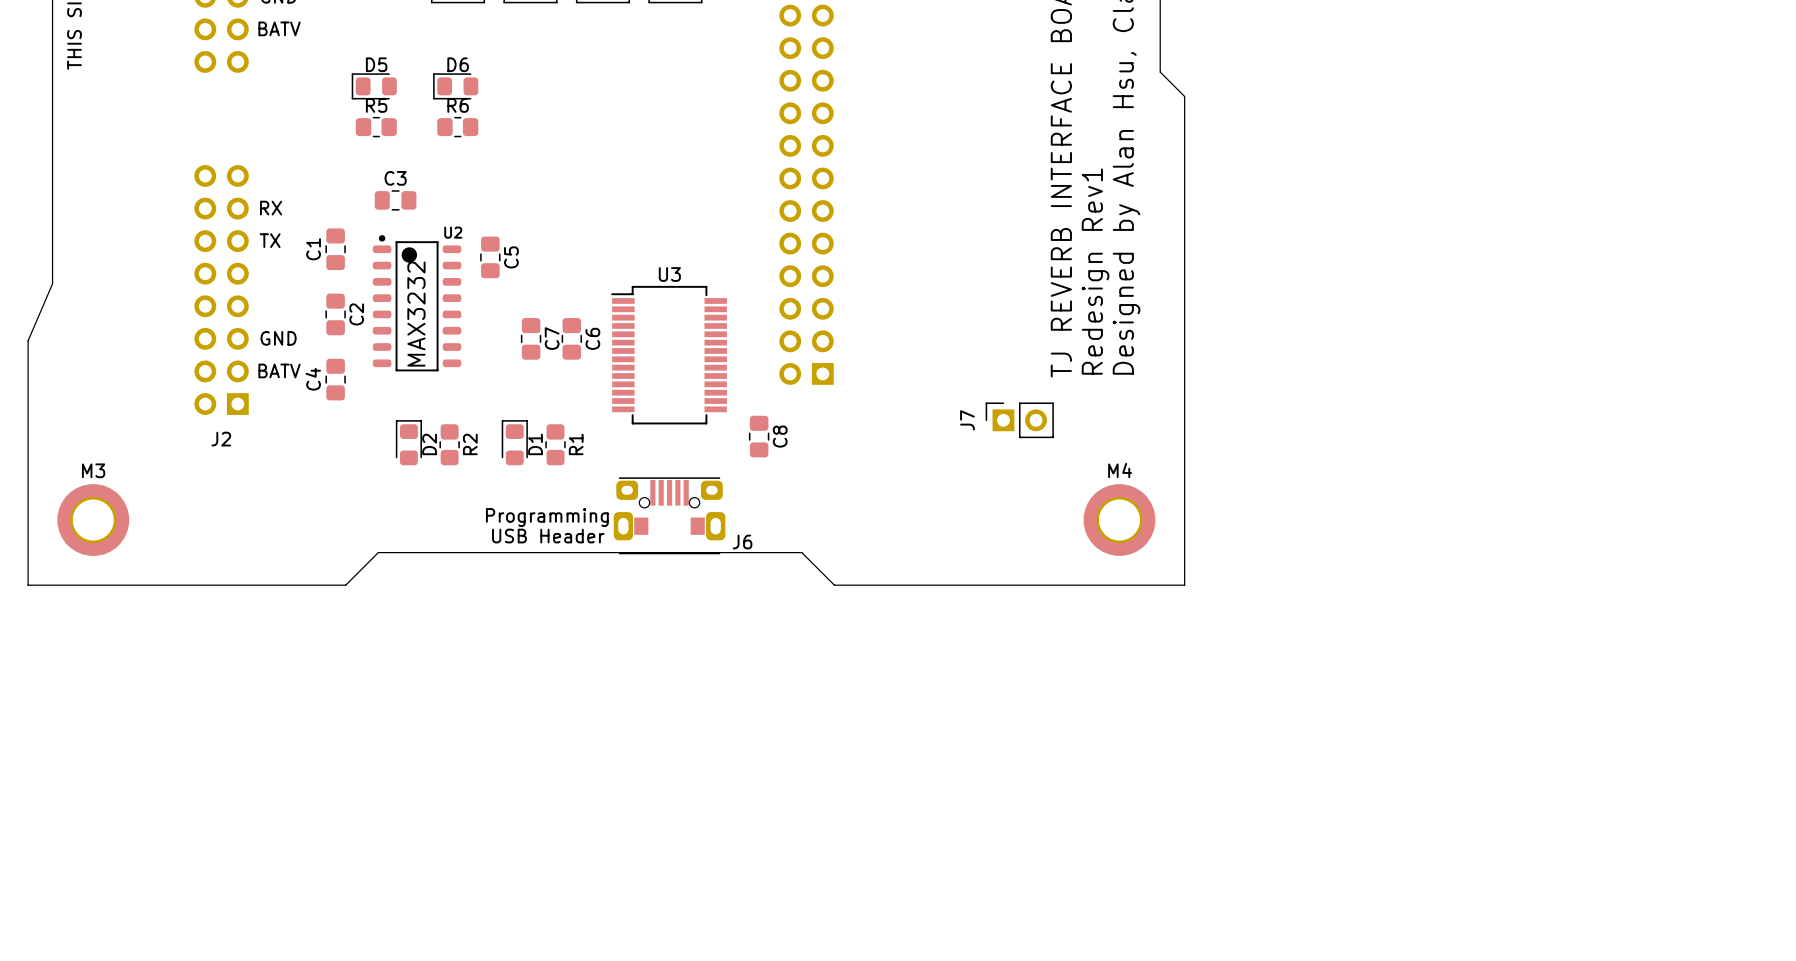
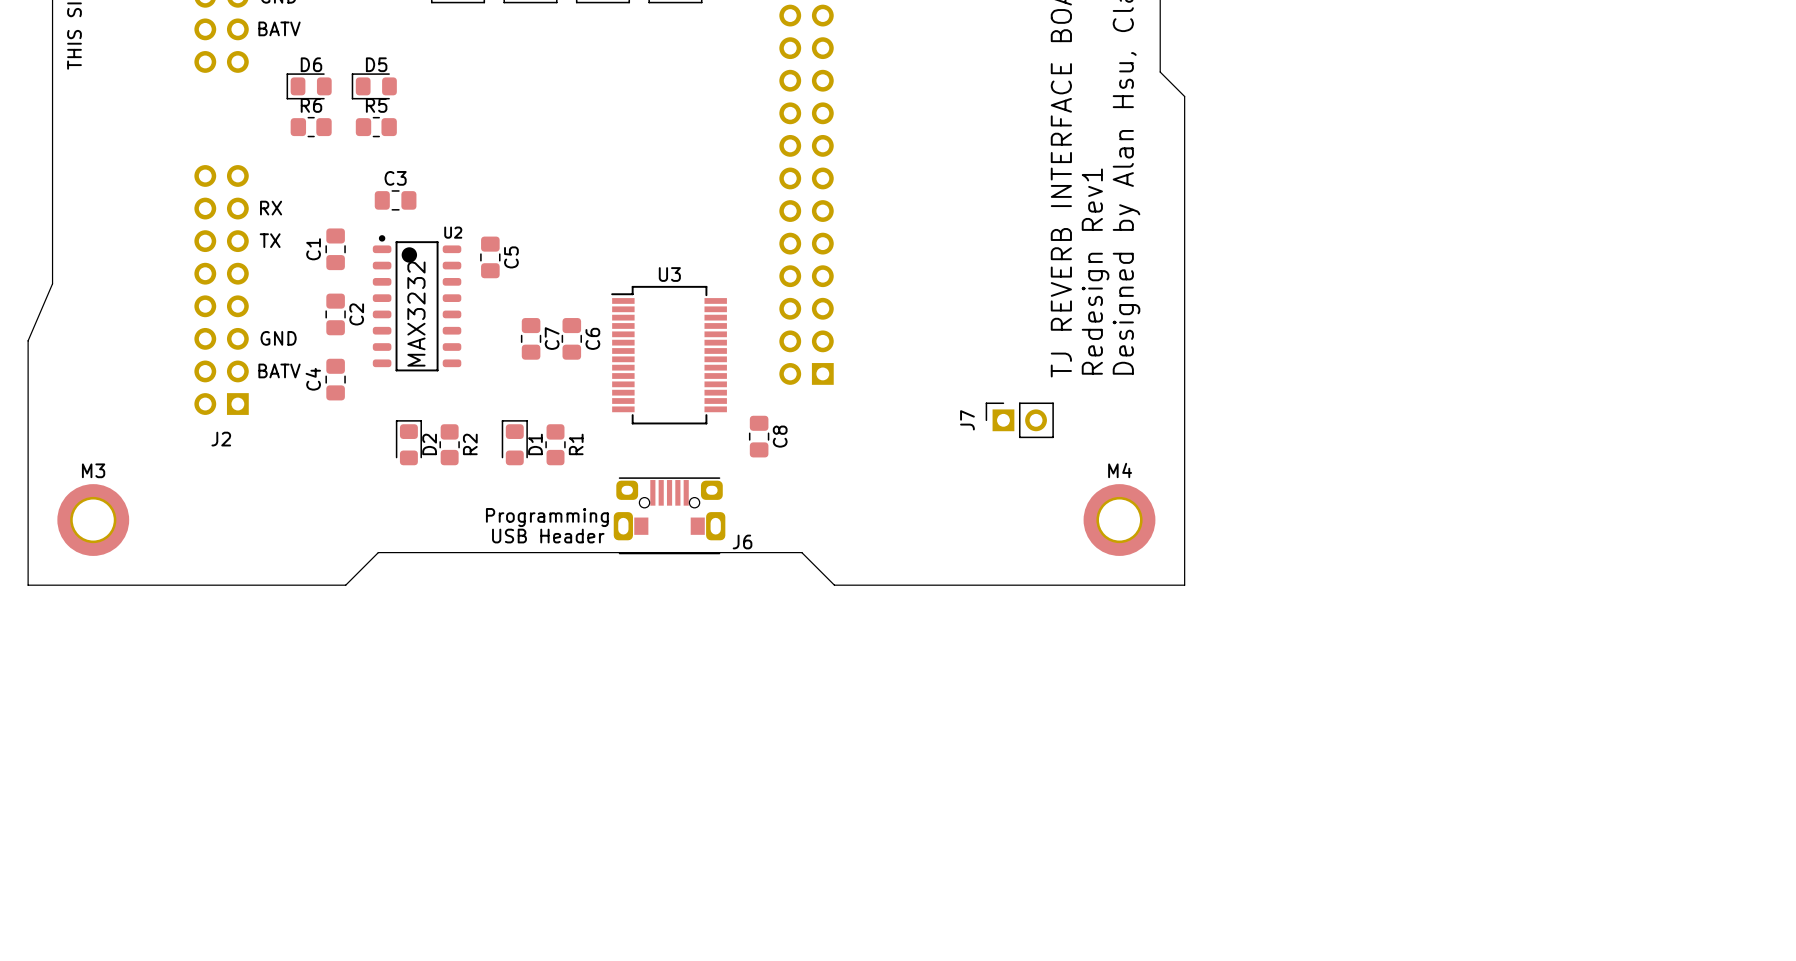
D6 position: (455, 86) -> (309, 86)
R6 position: (457, 127) -> (311, 127)

